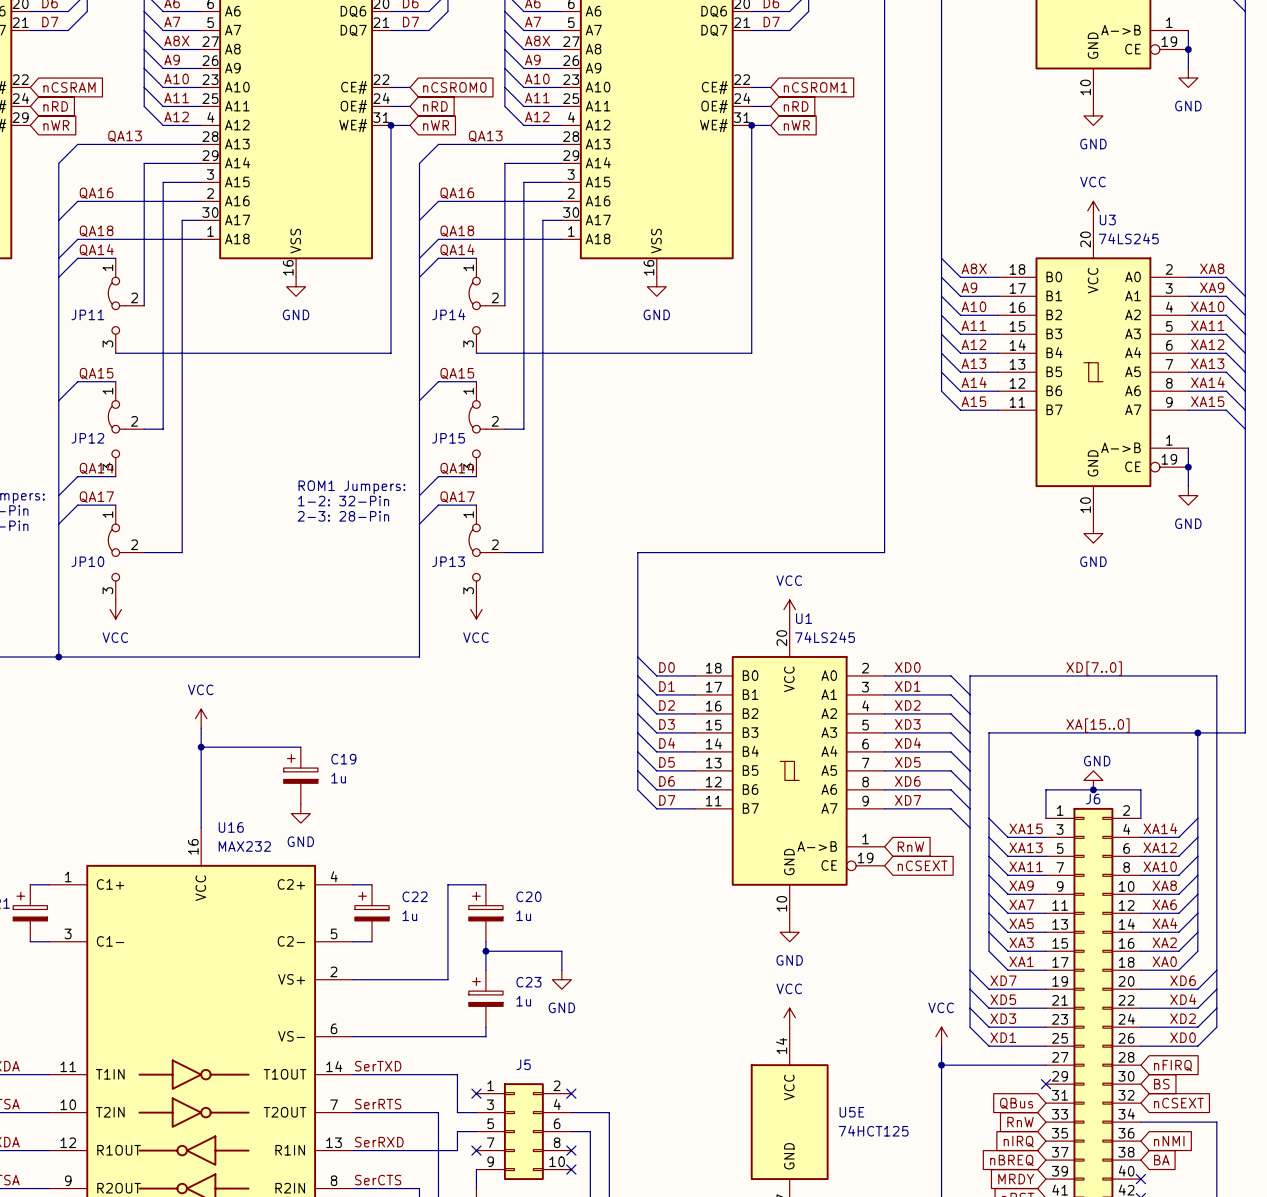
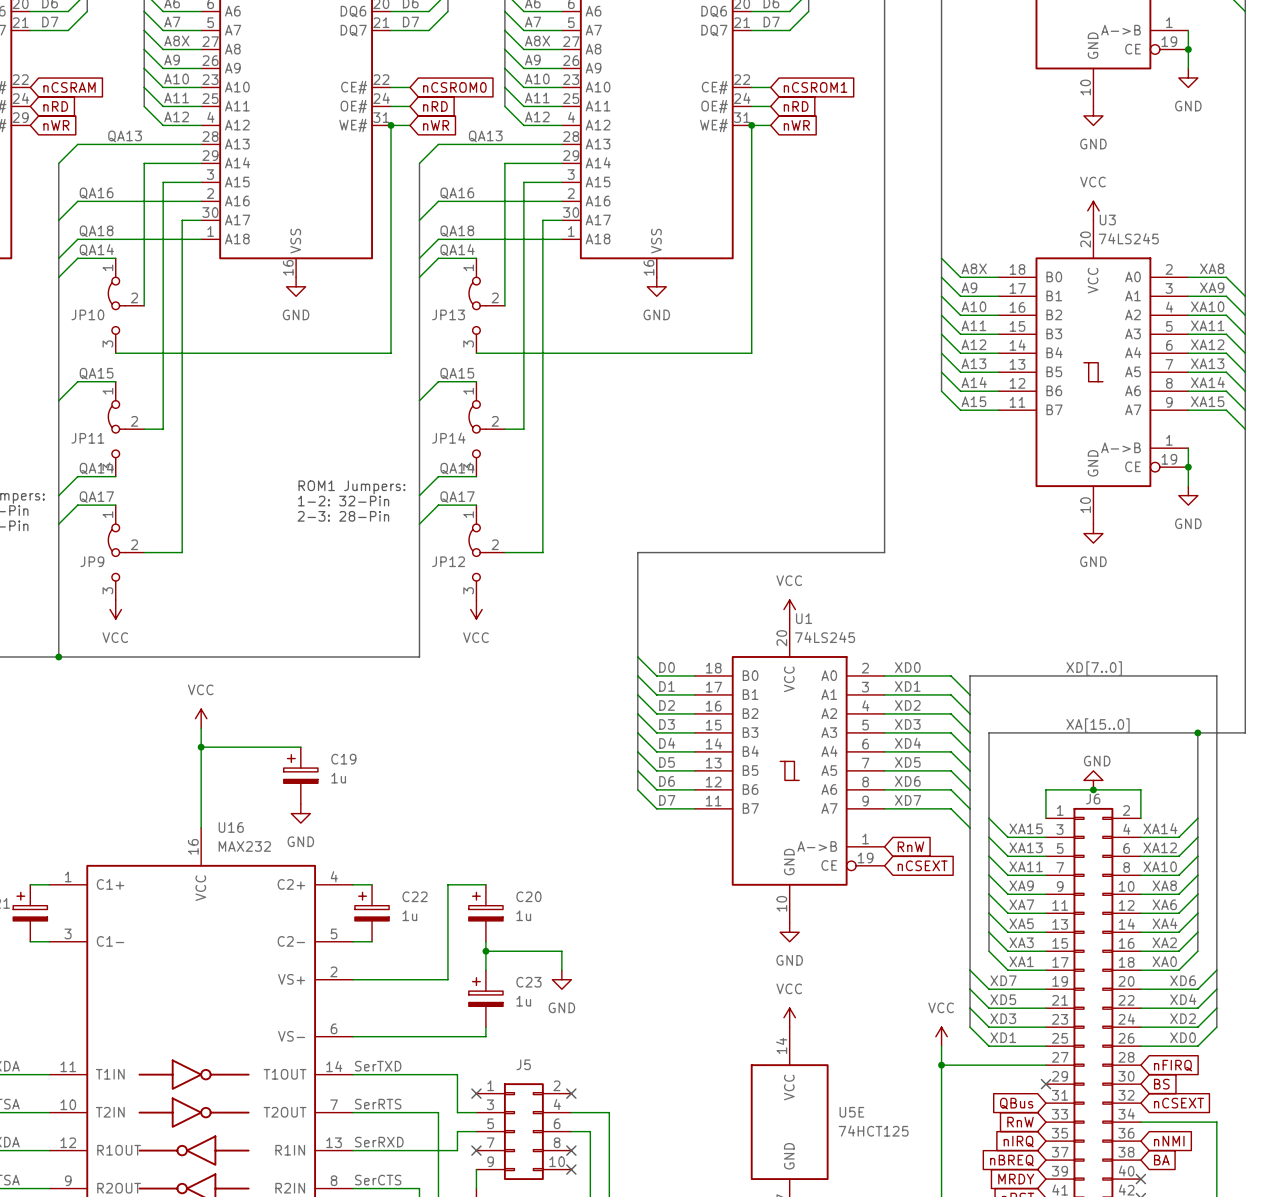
JP11 name: JP11 (87, 314) -> JP10 (87, 314)
JP14 name: JP14 (448, 314) -> JP13 (448, 314)
JP12 name: JP12 (87, 438) -> JP11 (87, 438)
JP15 name: JP15 (448, 438) -> JP14 (448, 438)
JP10 name: JP10 (87, 561) -> JP9 (92, 561)
JP13 name: JP13 (448, 561) -> JP12 (448, 561)

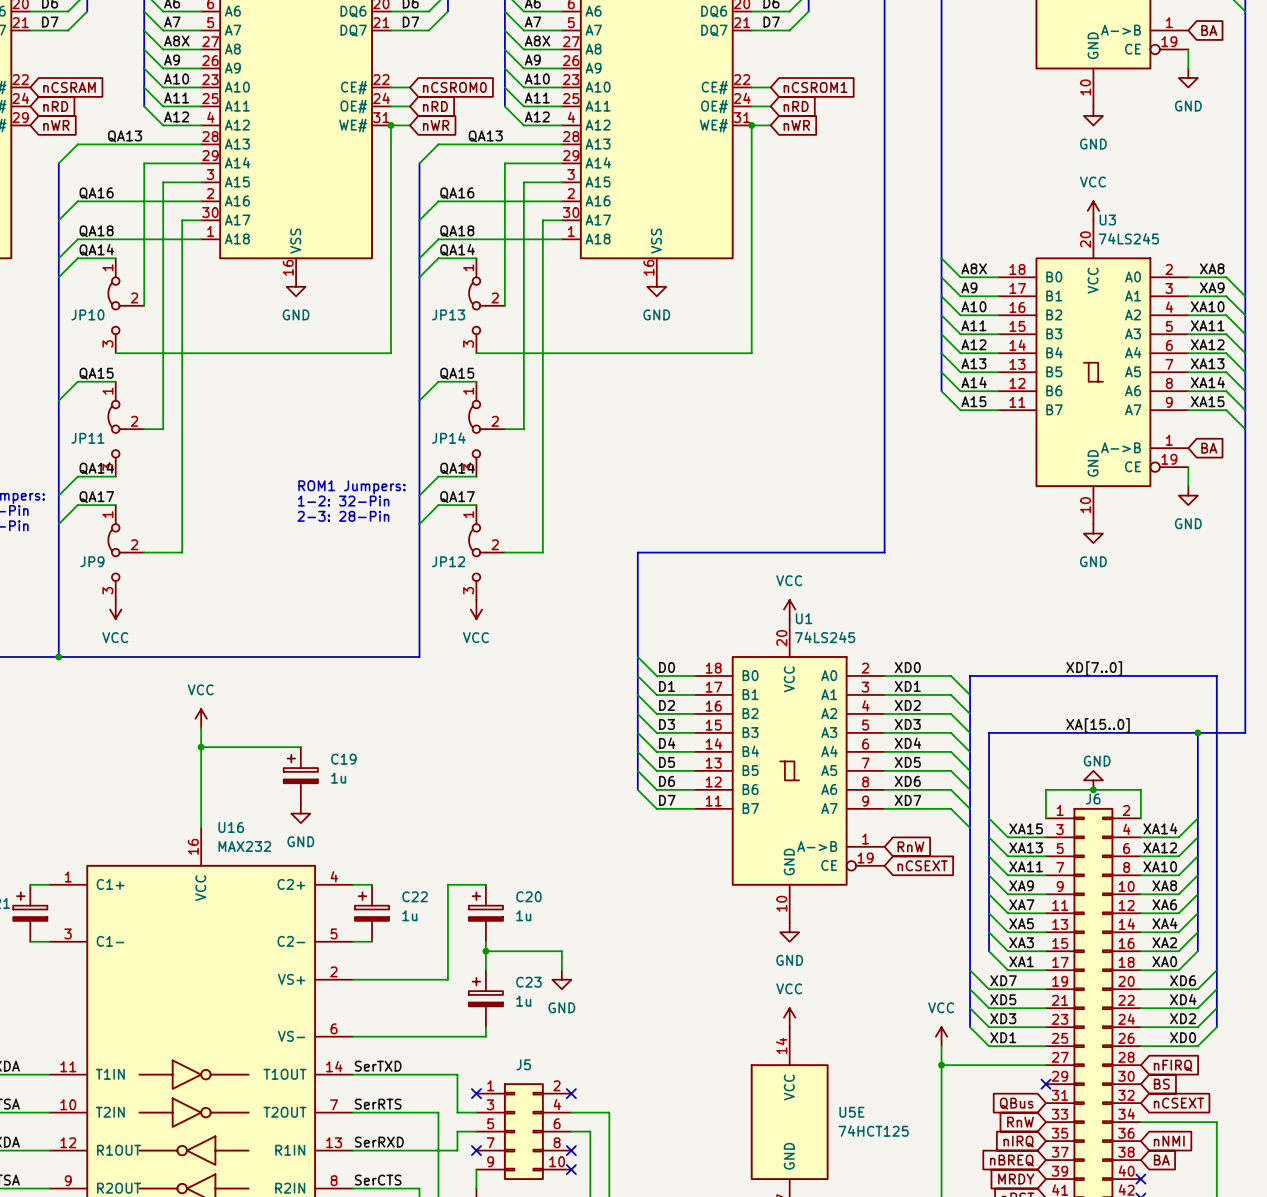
wire: (1188, 30) (1188, 49) -> none
global label: none -> BA (1209, 30)
junction: (1188, 49) -> none
wire: (1188, 448) (1188, 467) -> none
global label: none -> BA (1209, 448)
junction: (1188, 467) -> none

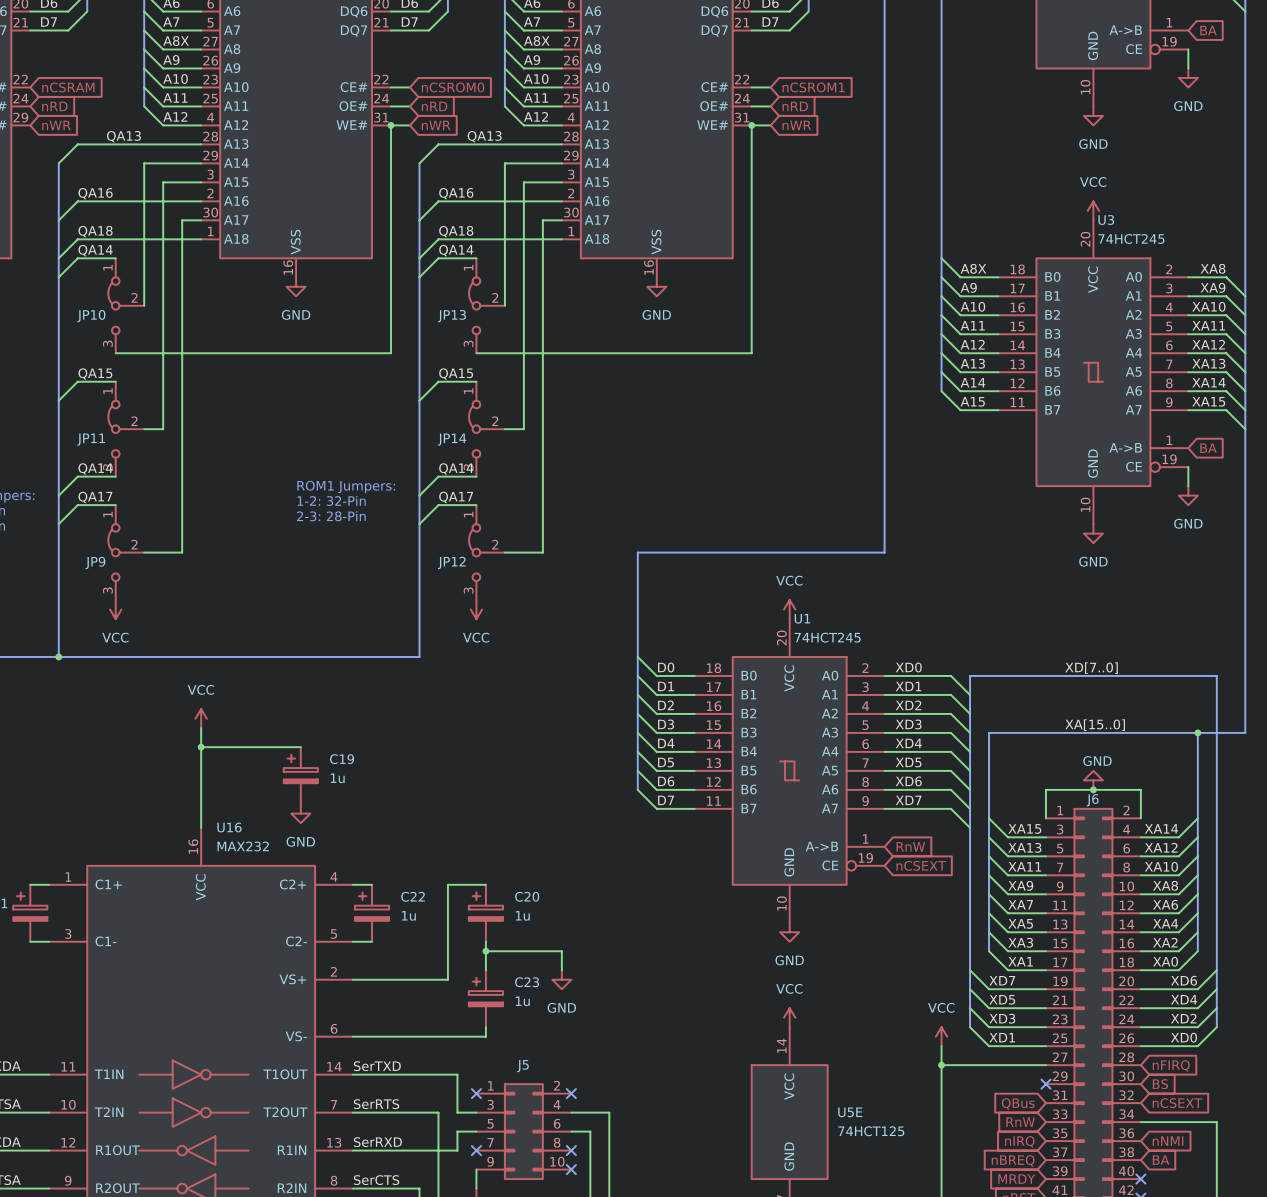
U3 value: 74LS245 (1128, 238) -> 74HCT245 (1131, 238)
U1 value: 74LS245 (825, 637) -> 74HCT245 (827, 637)

